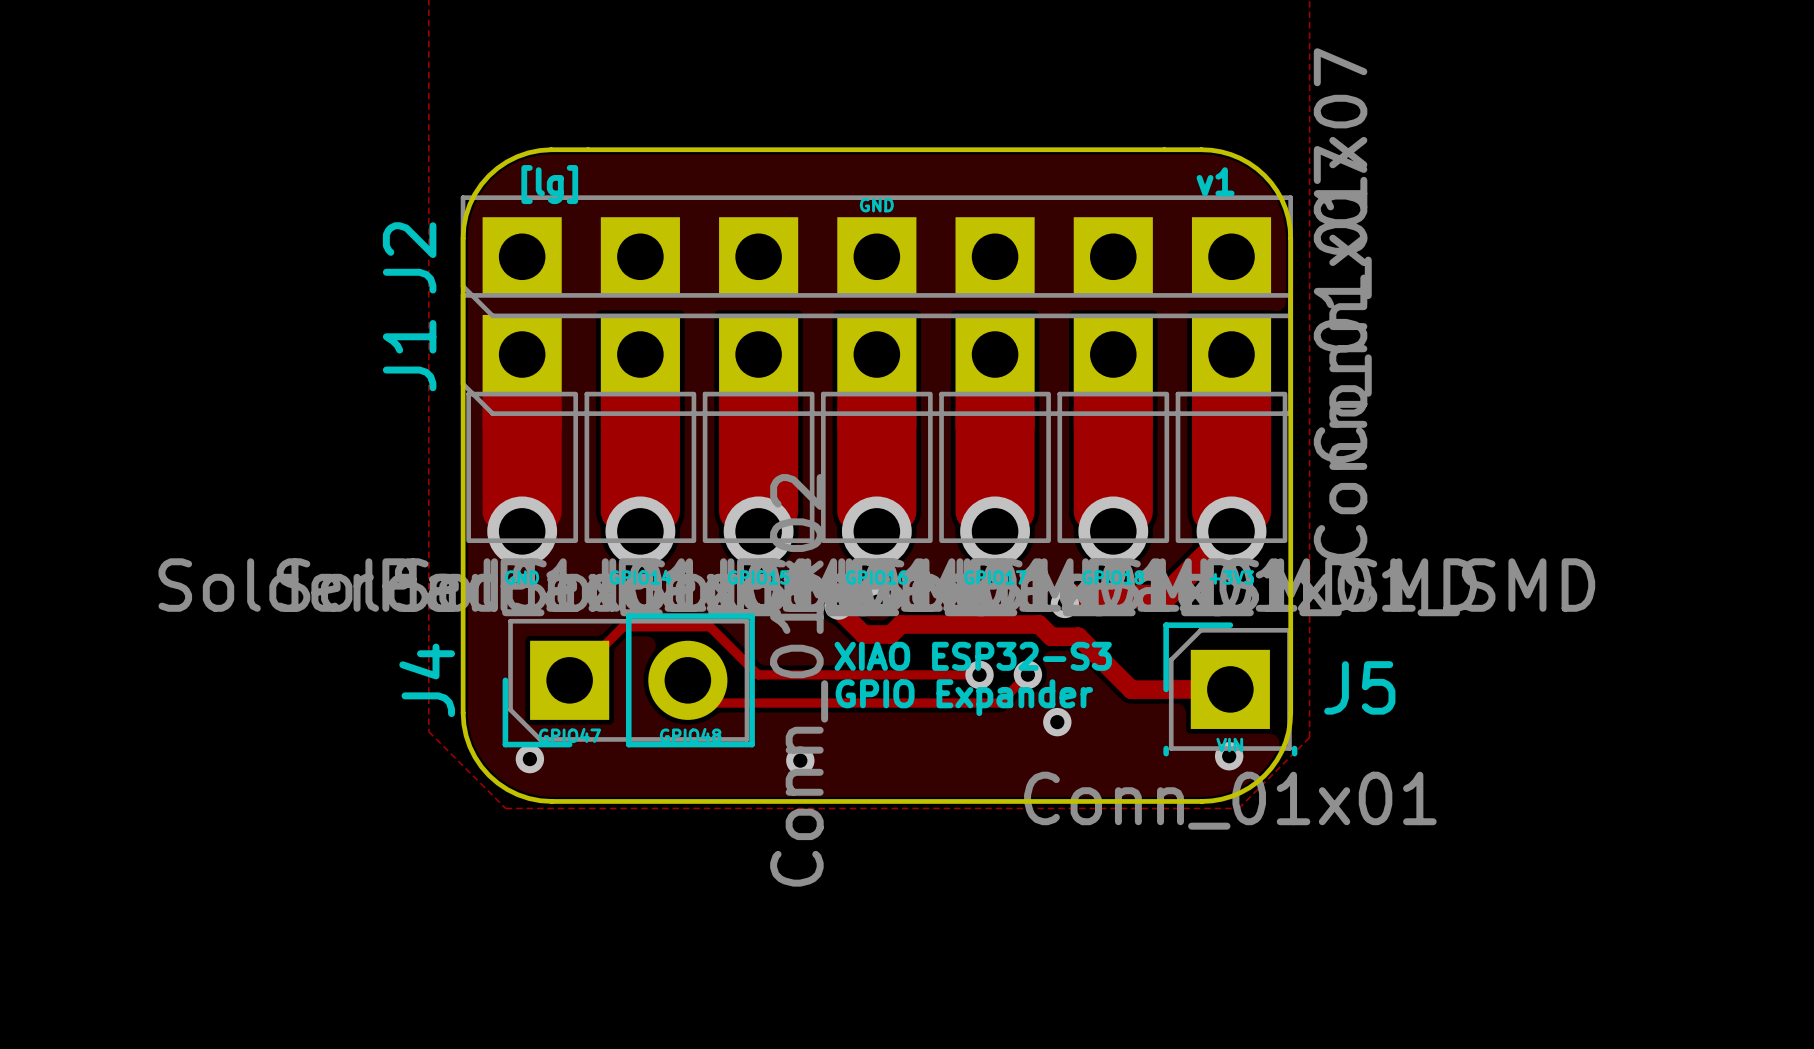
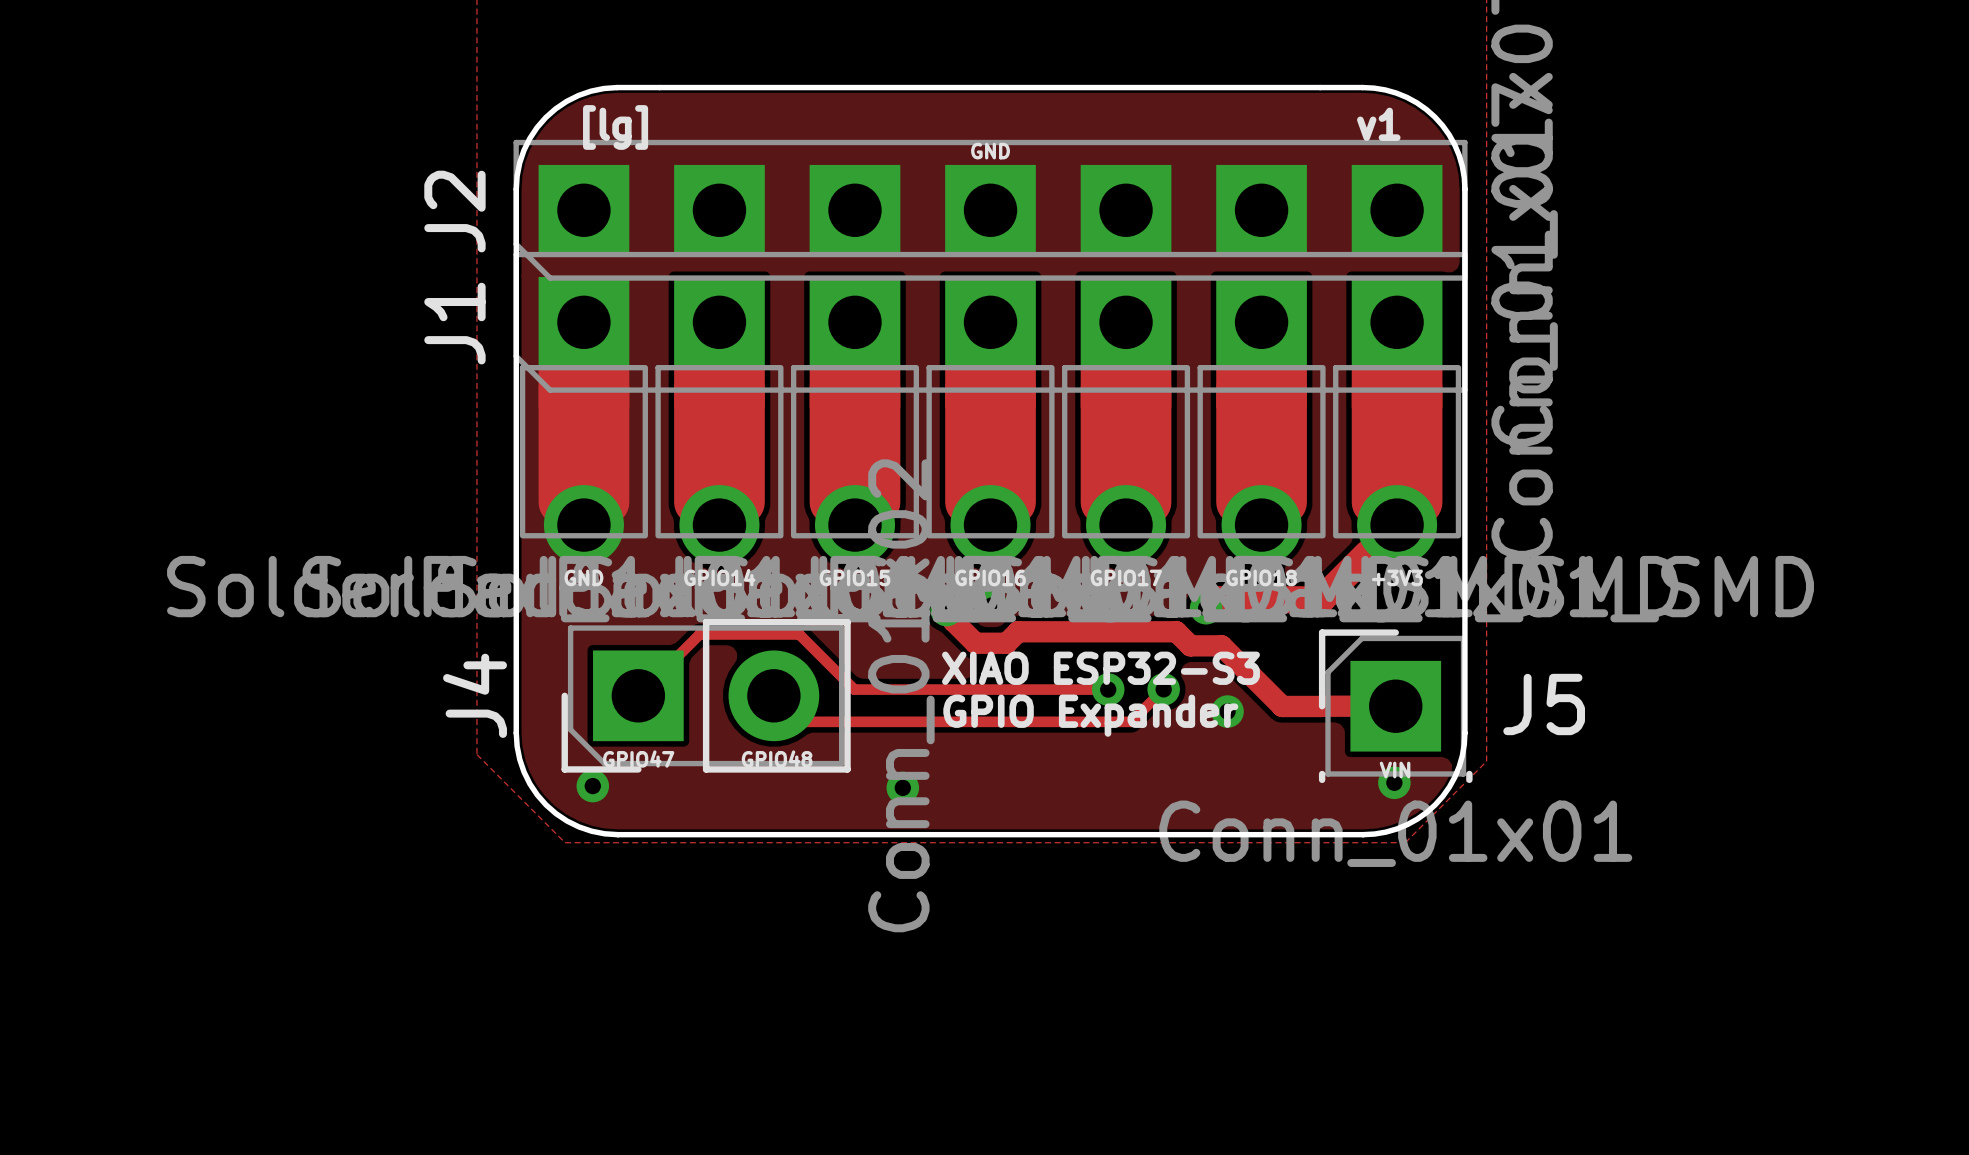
via position: (1057, 722) -> (1227, 711)

